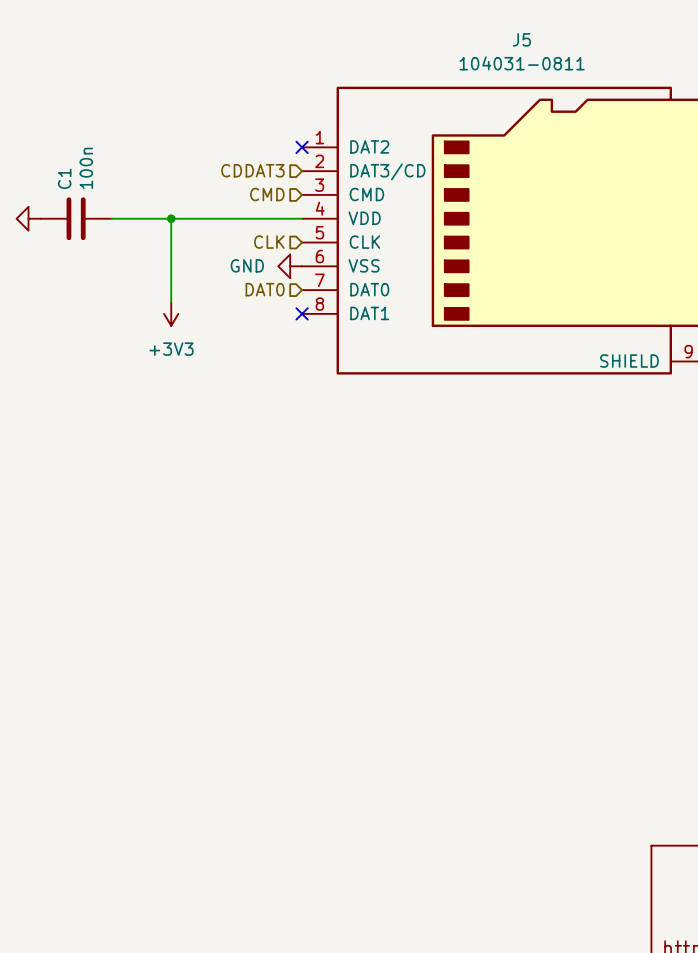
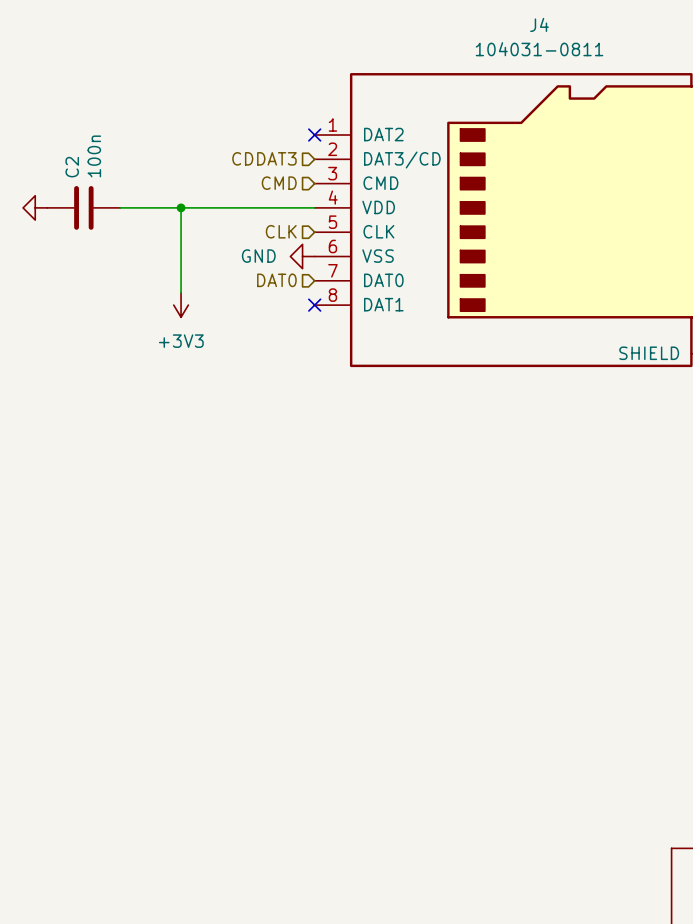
J5 name: J5 (521, 39) -> J4 (539, 24)
C1 name: C1 (64, 178) -> C2 (72, 167)

